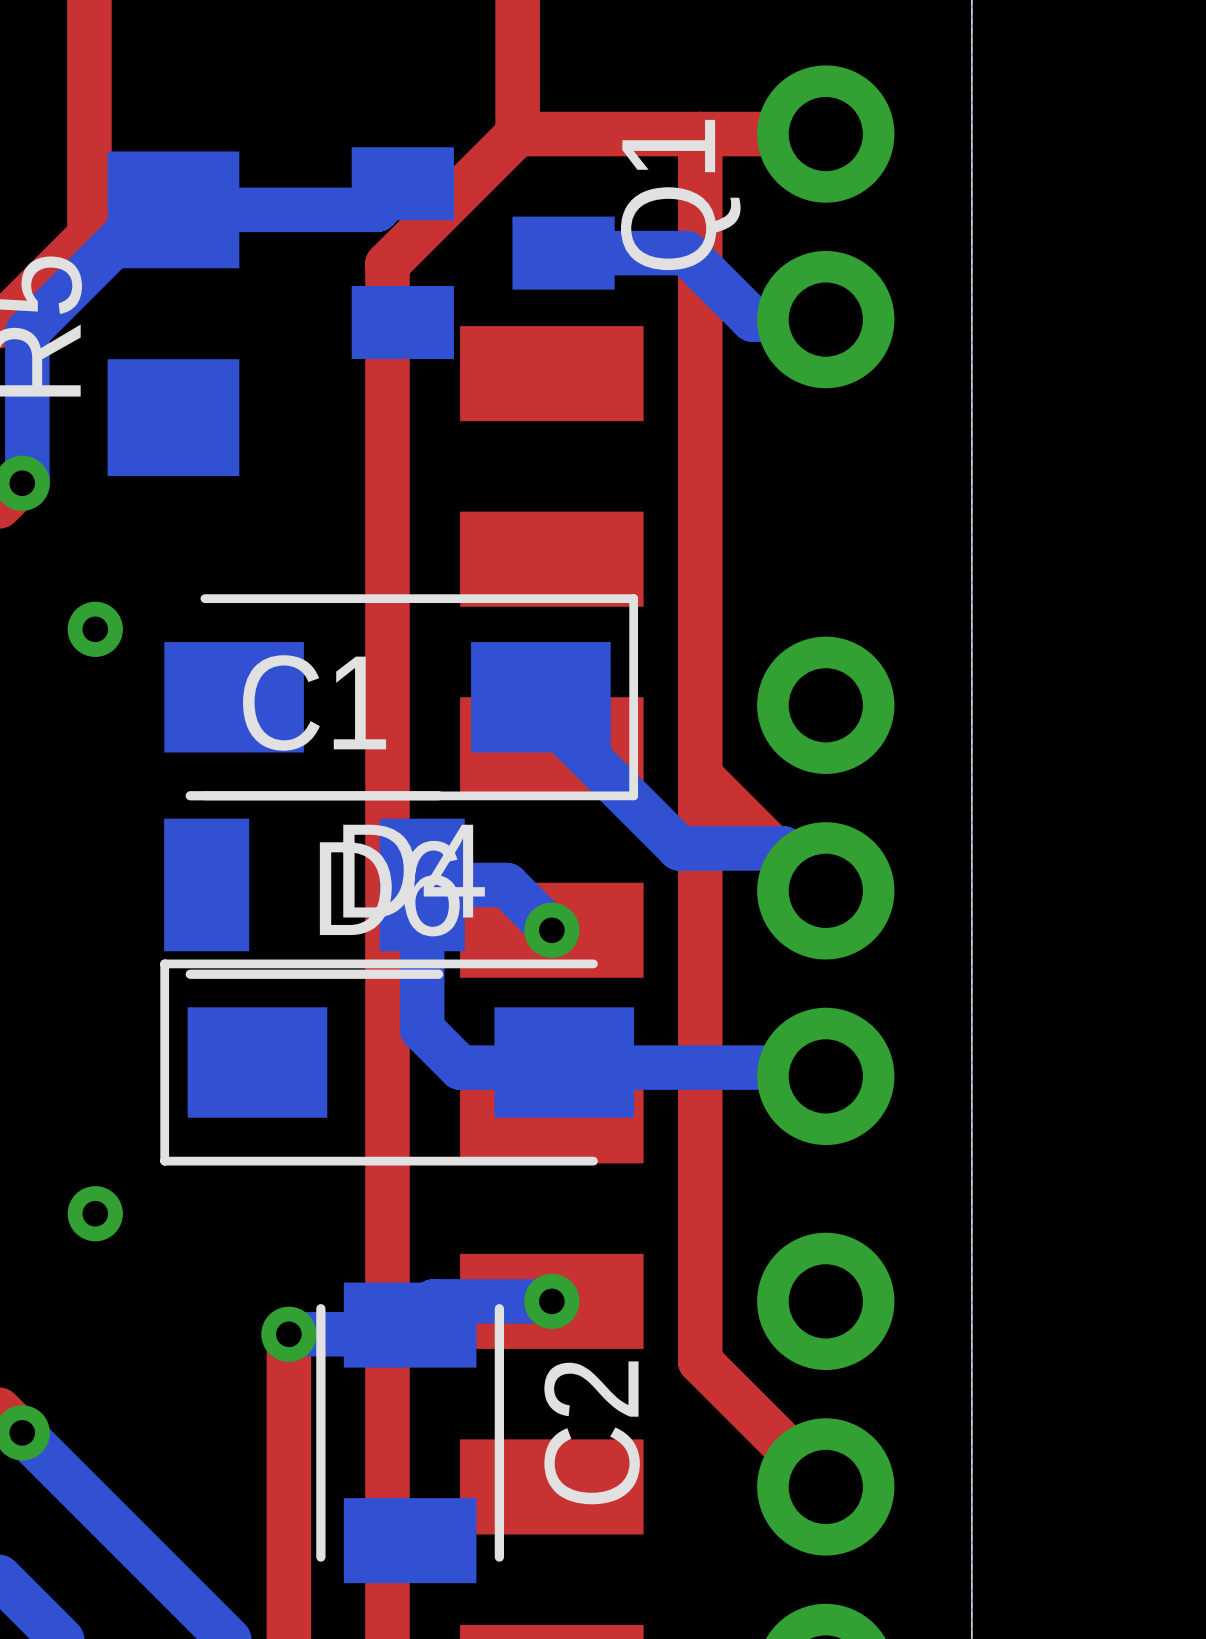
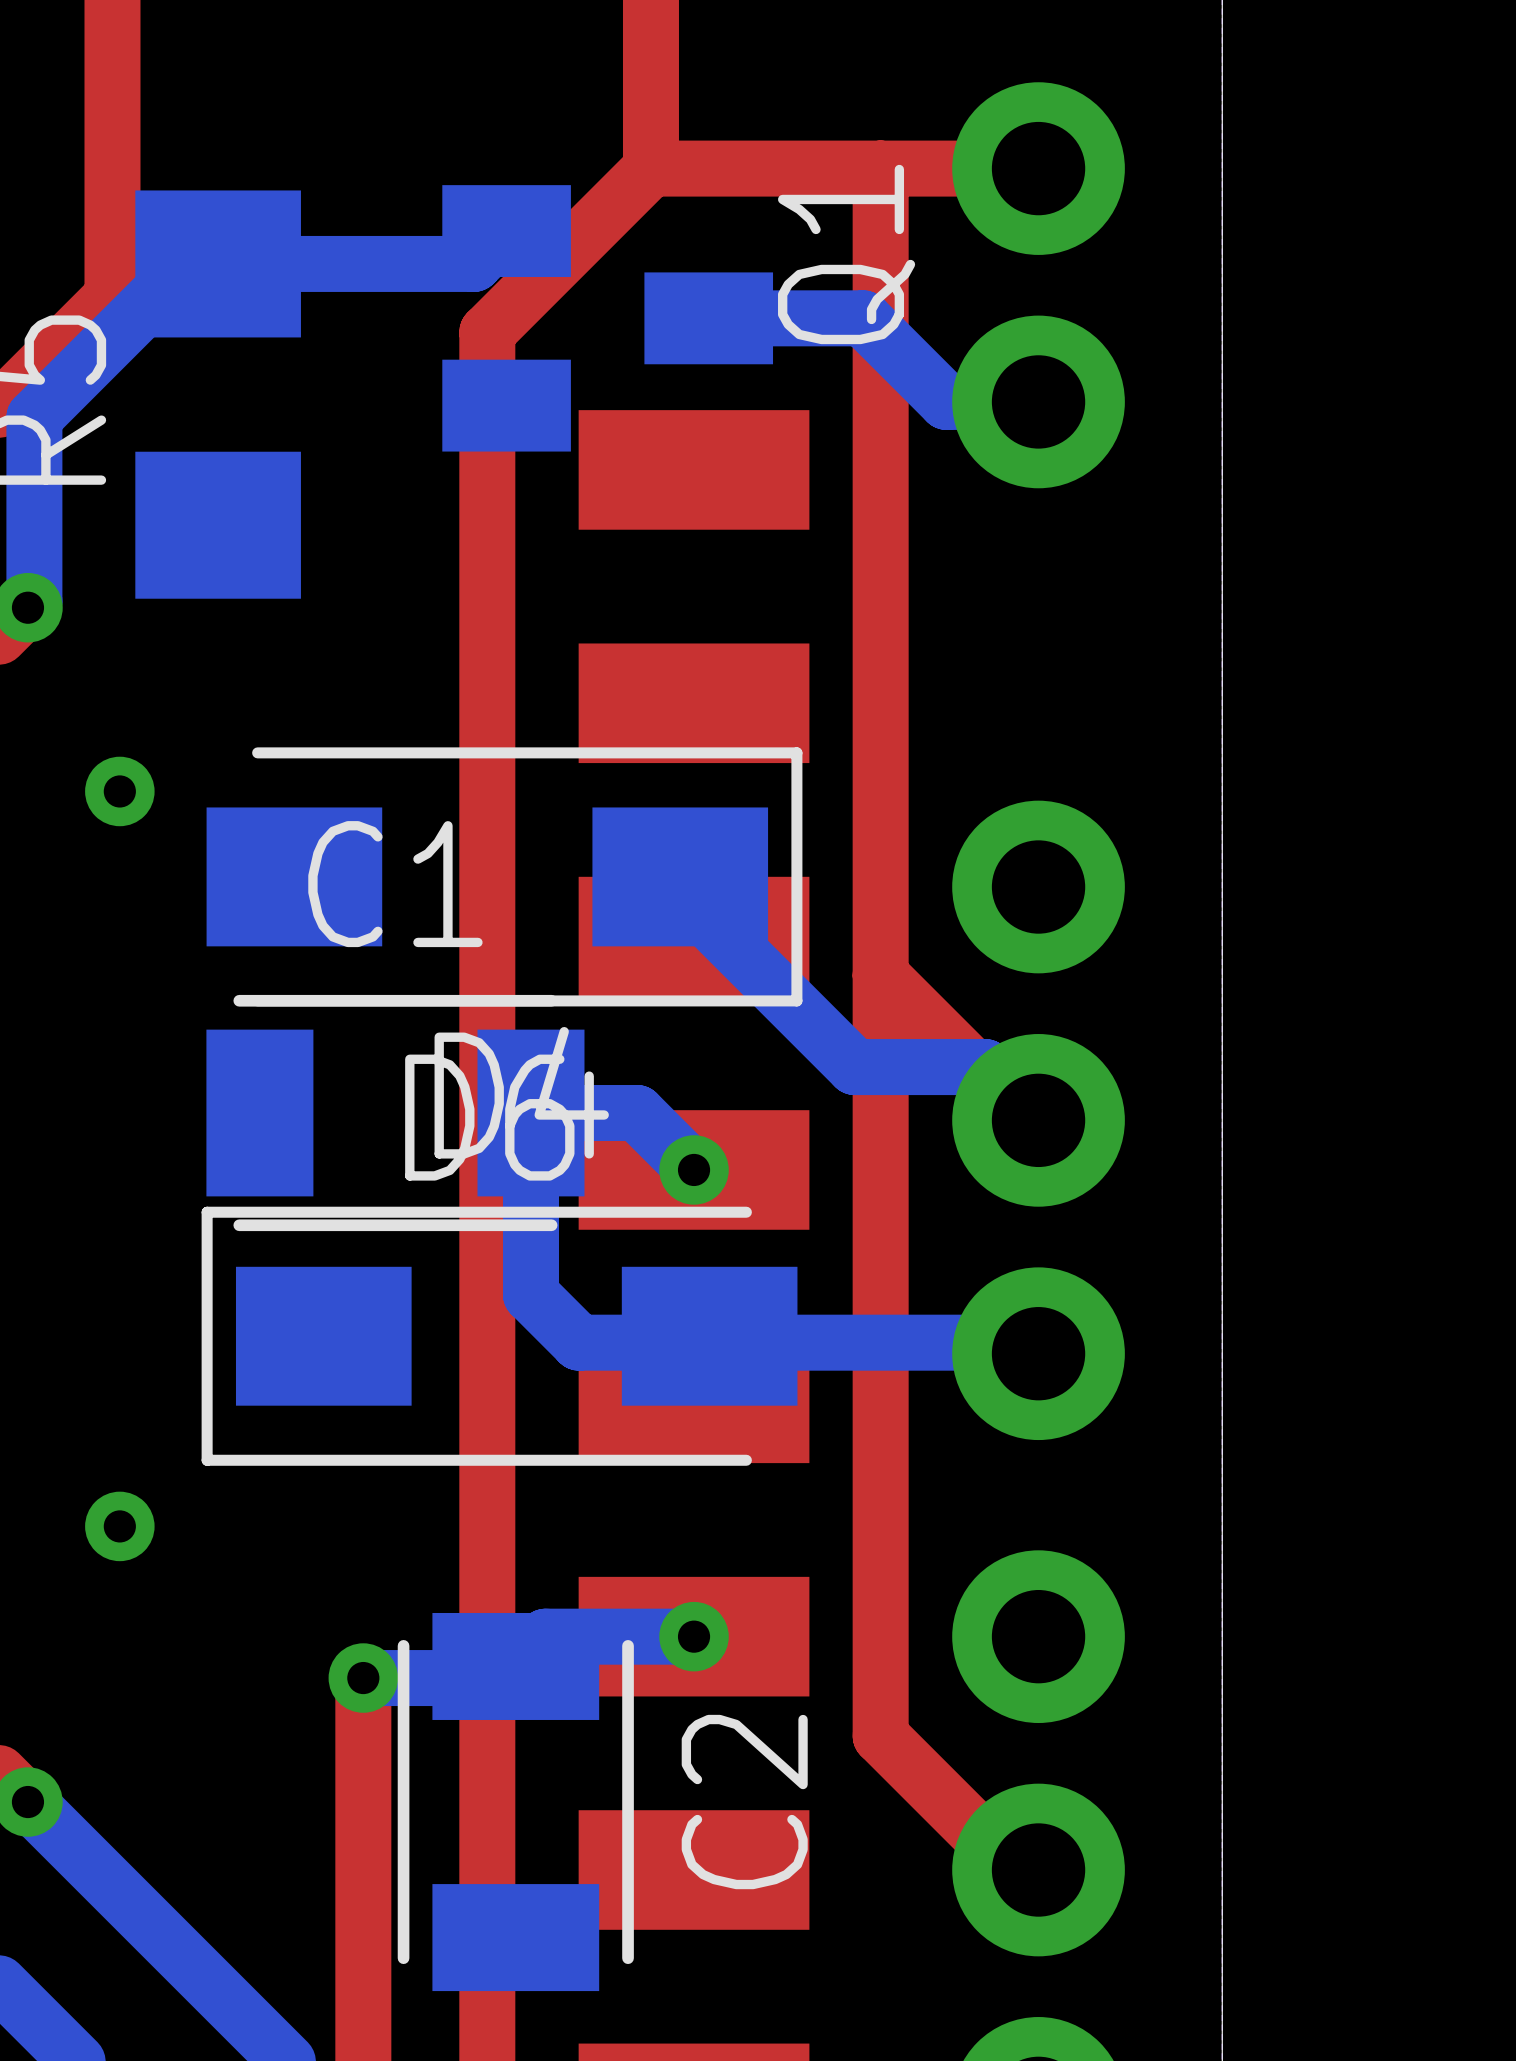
top track: (700, 1361) (825, 1486) -> (880, 1712) (880, 1736) (1014, 1870) (1038, 1870)

